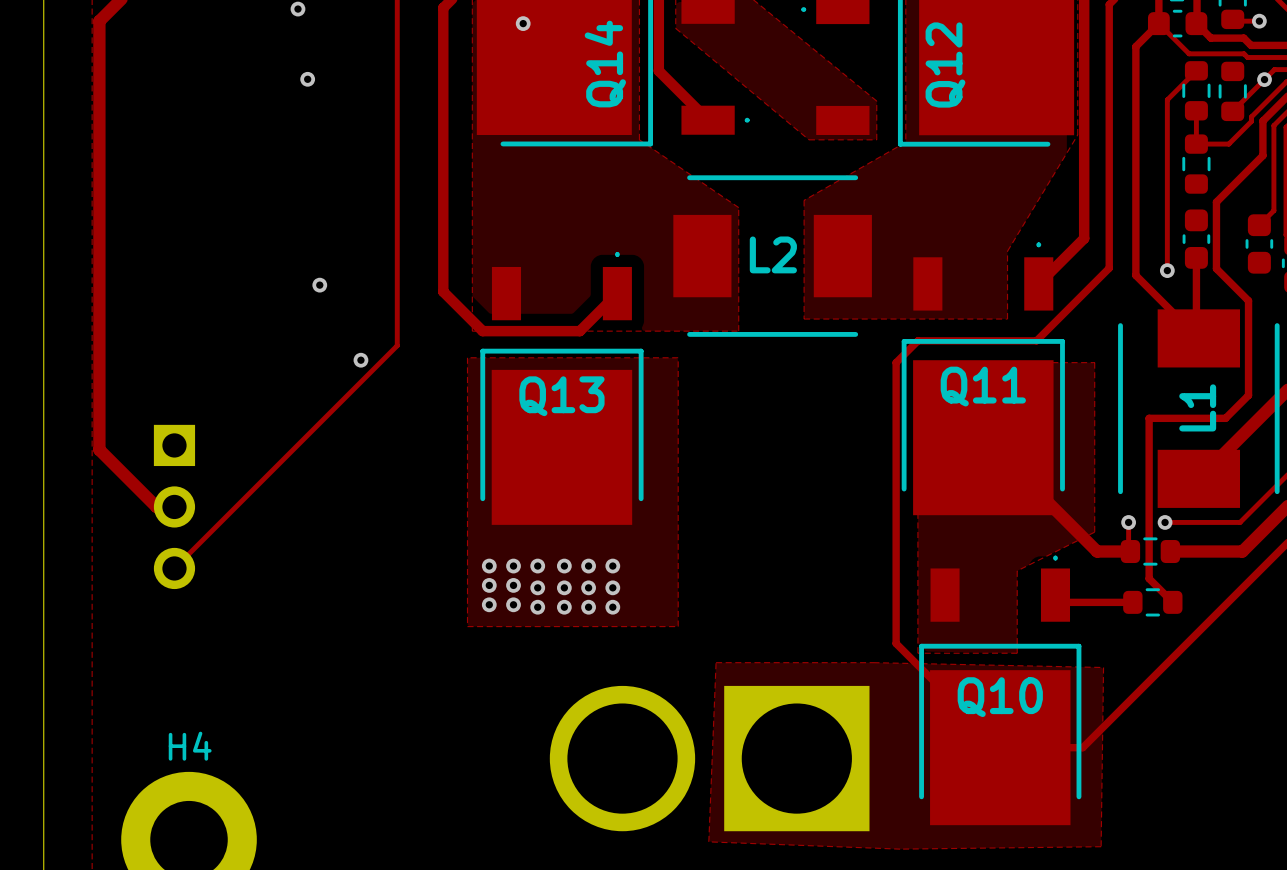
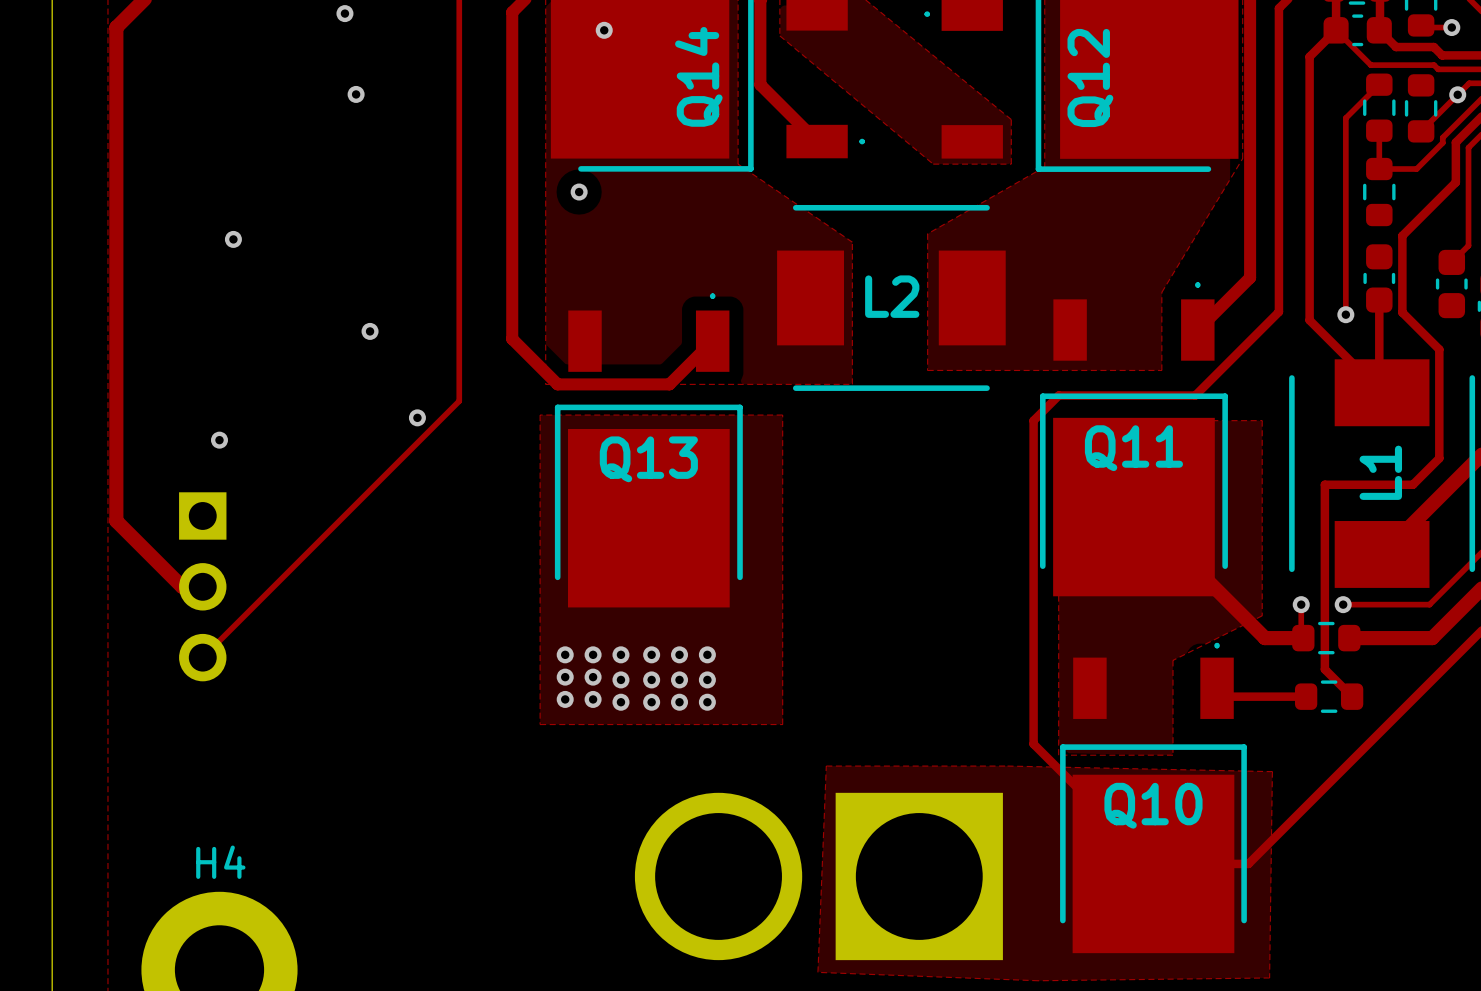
via: none -> (579, 192)
via: none -> (233, 239)
via: none -> (219, 440)

